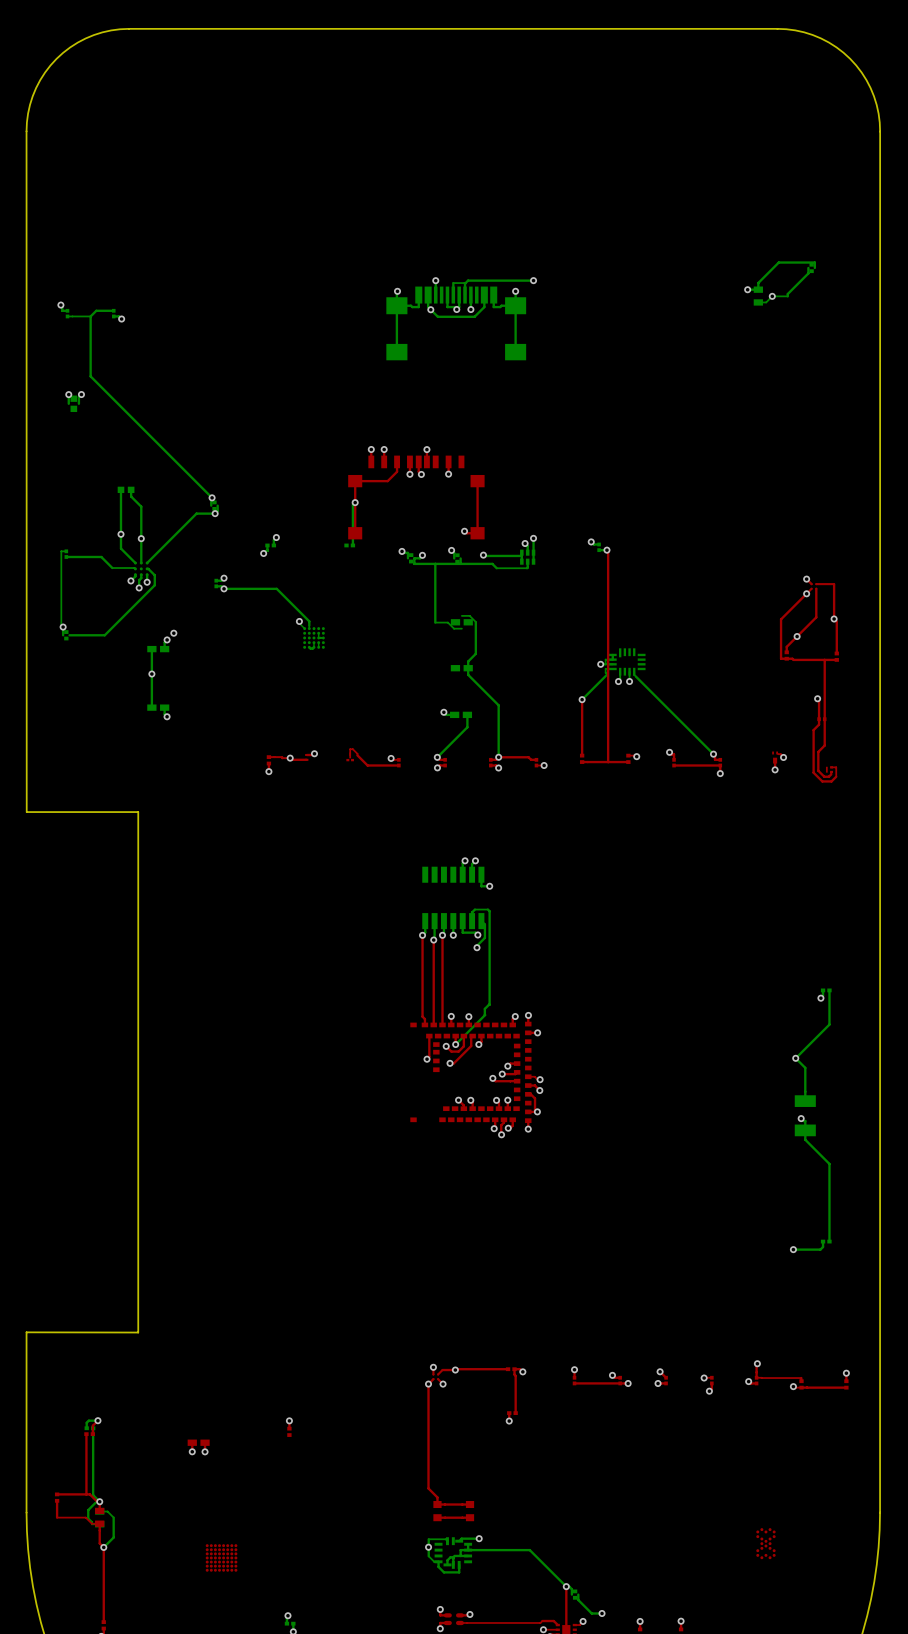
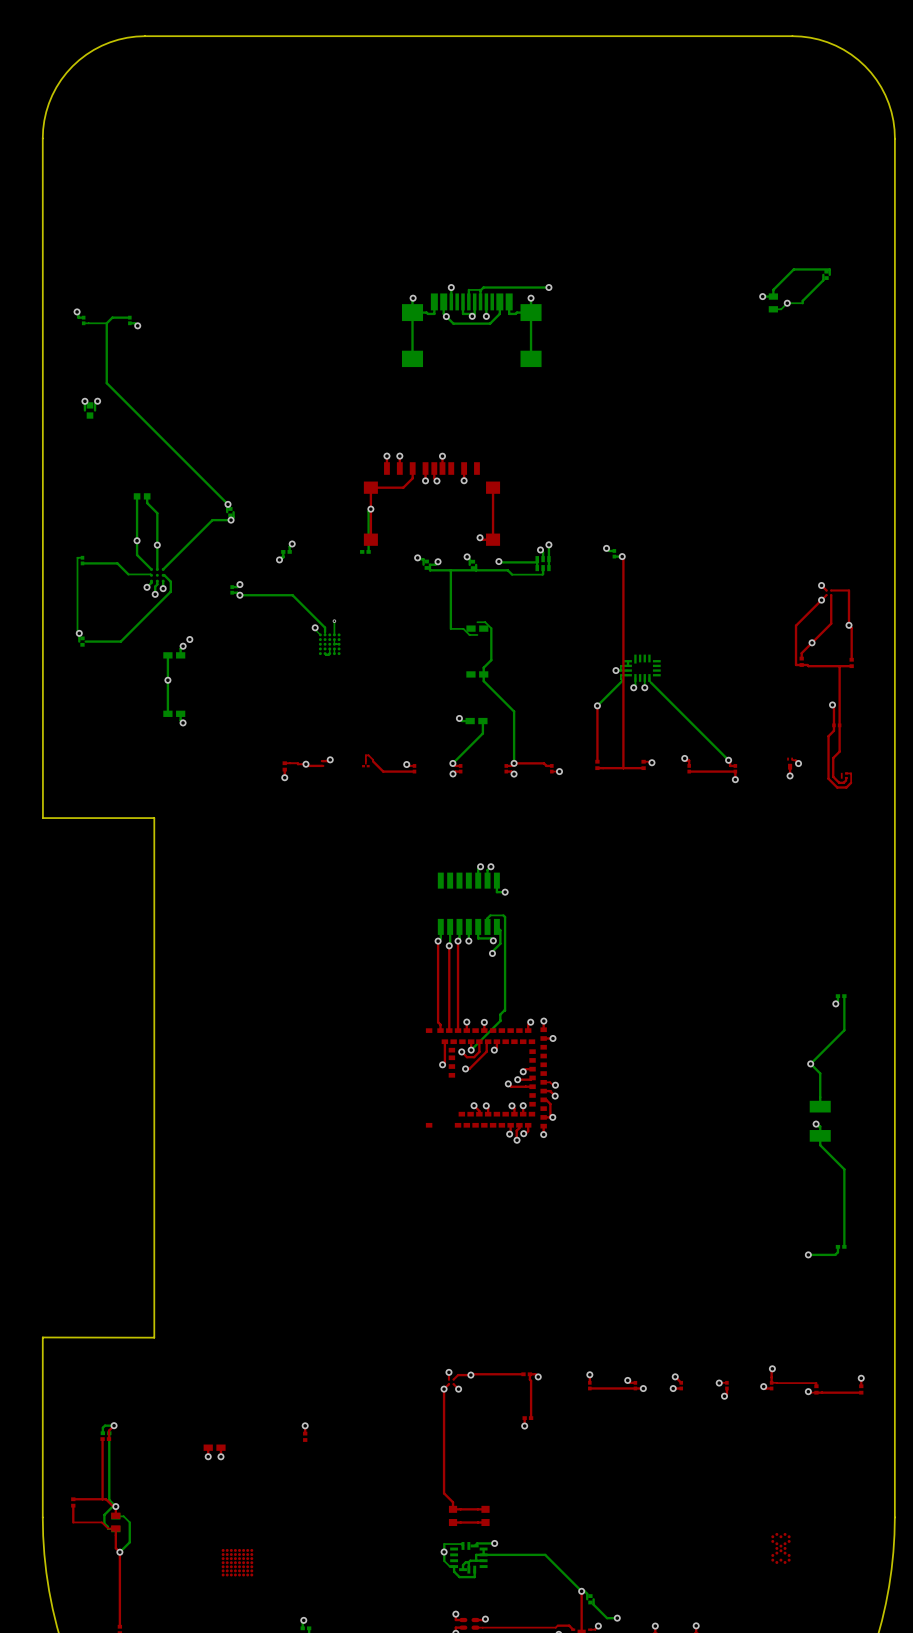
bottom track: none -> (334, 621) (334, 634)
via: none -> (334, 621)

